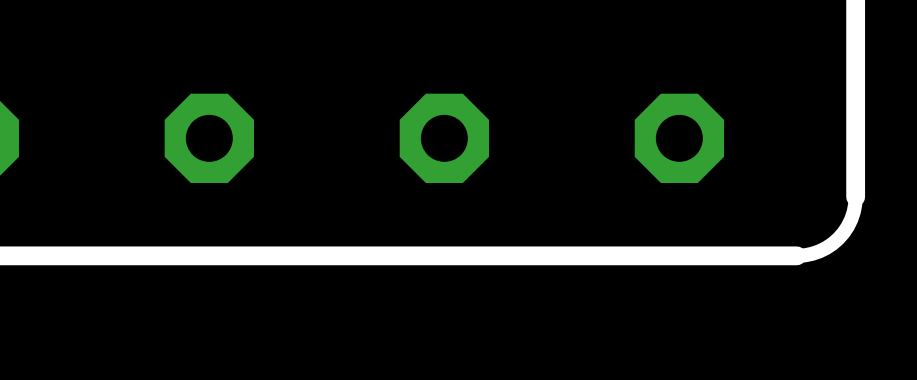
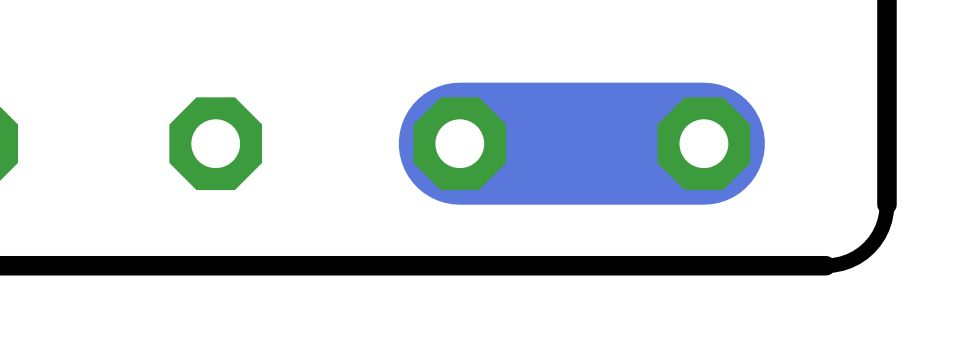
track: none -> (703, 143) (459, 143)

